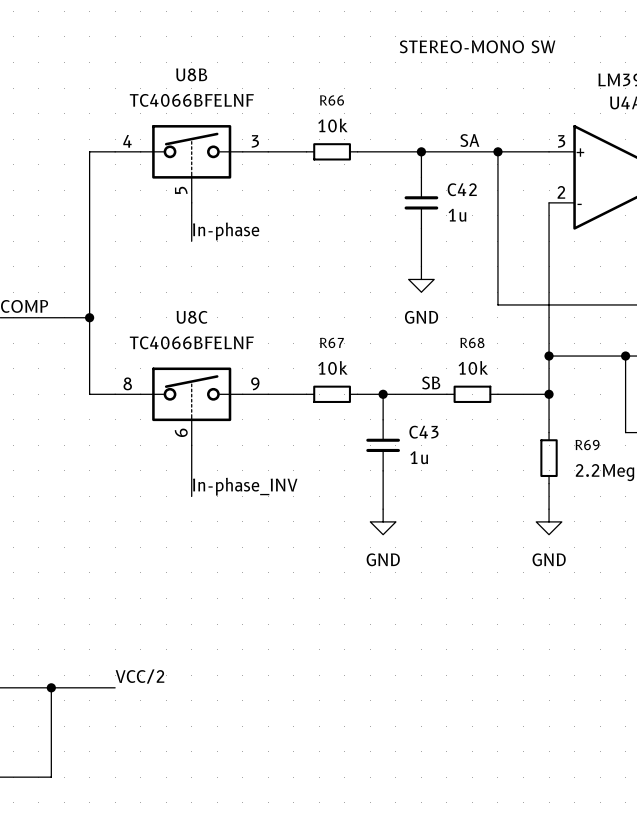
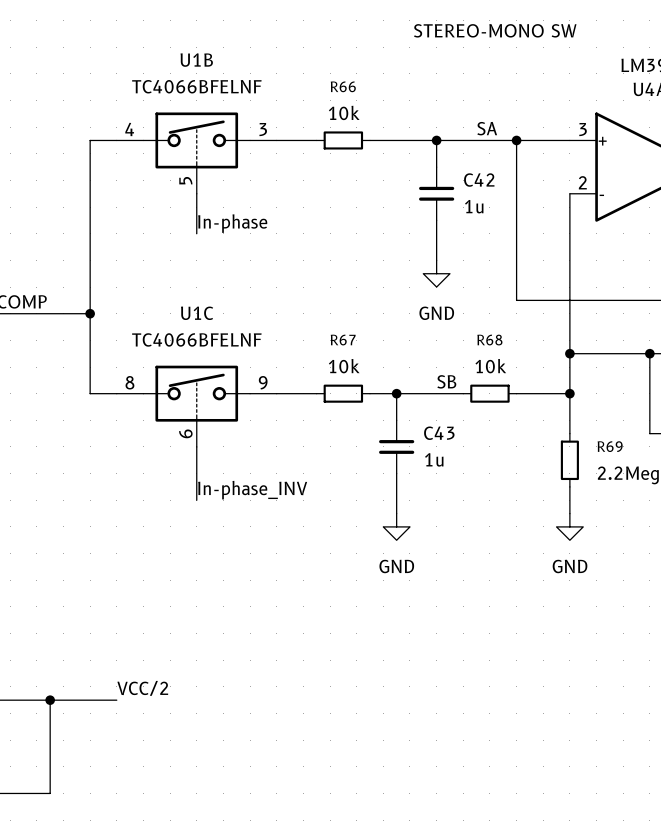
U8B name: U8B (191, 74) -> U1B (196, 60)
U8C name: U8C (192, 317) -> U1C (197, 313)

